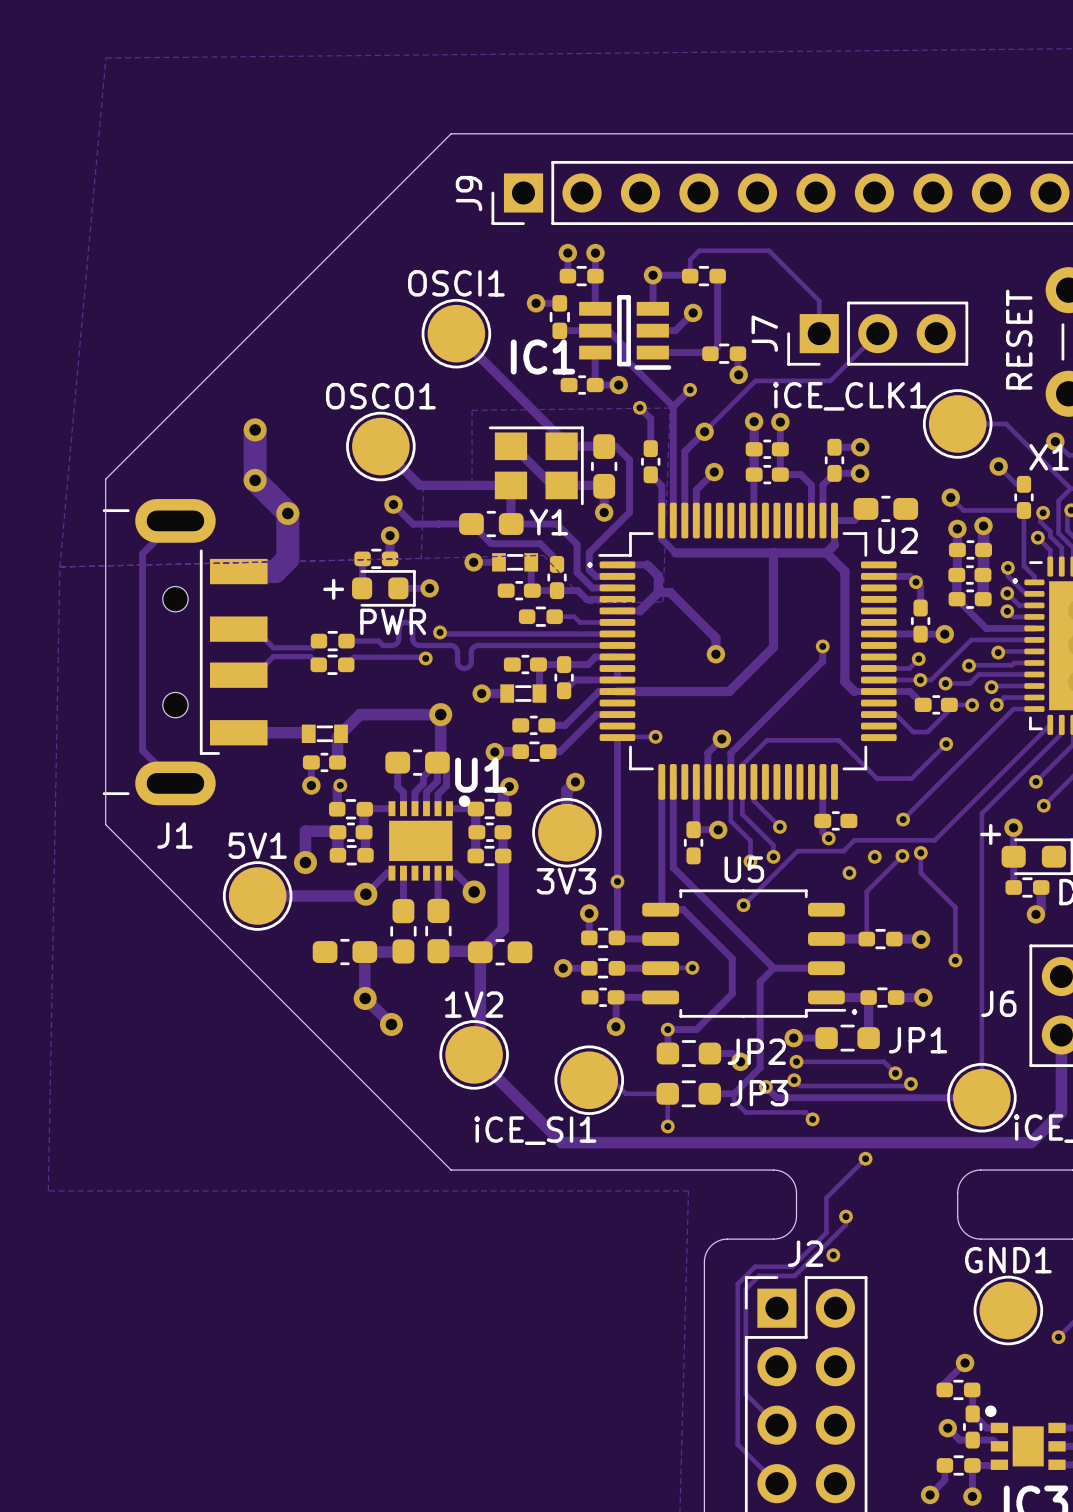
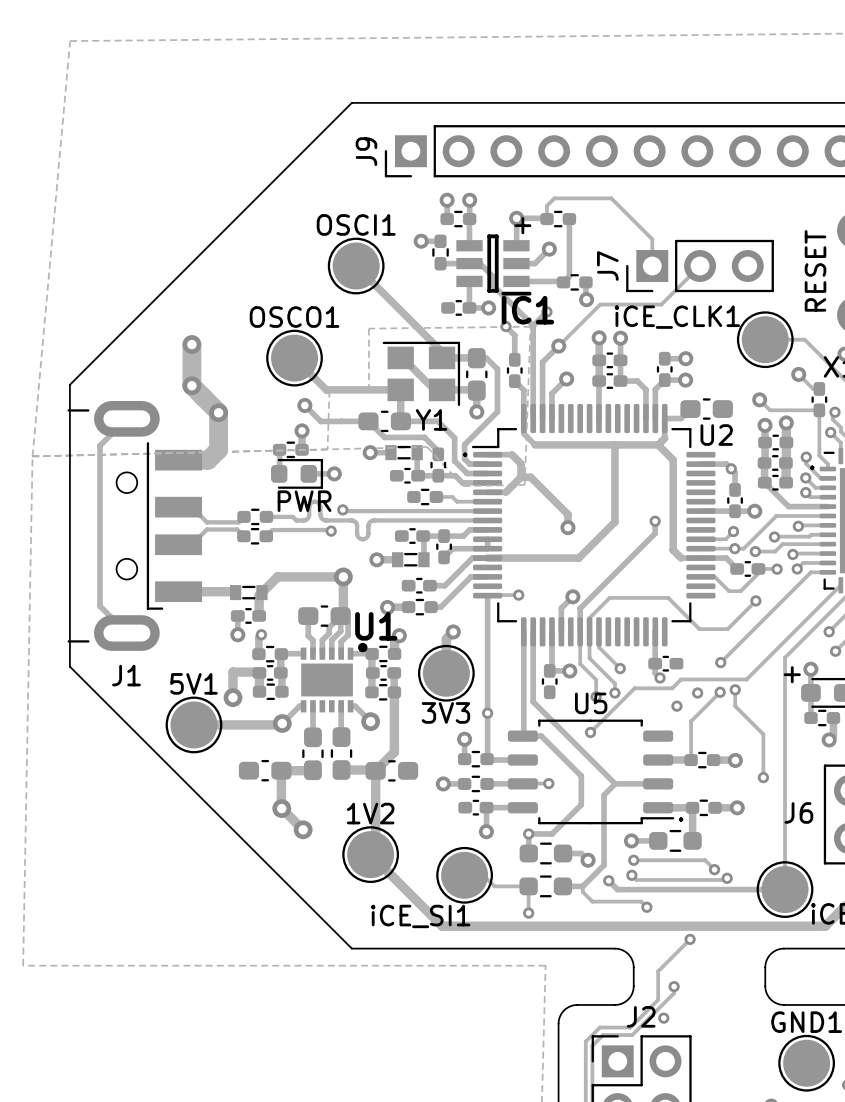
IC1 name position: IC1 (542, 357) -> IC1 (527, 310)
text position: + (333, 589) -> + (522, 225)
JP1 name: JP1 (918, 1040) -> none
JP2 name: JP2 (756, 1051) -> none
JP3 name: JP3 (759, 1093) -> none

